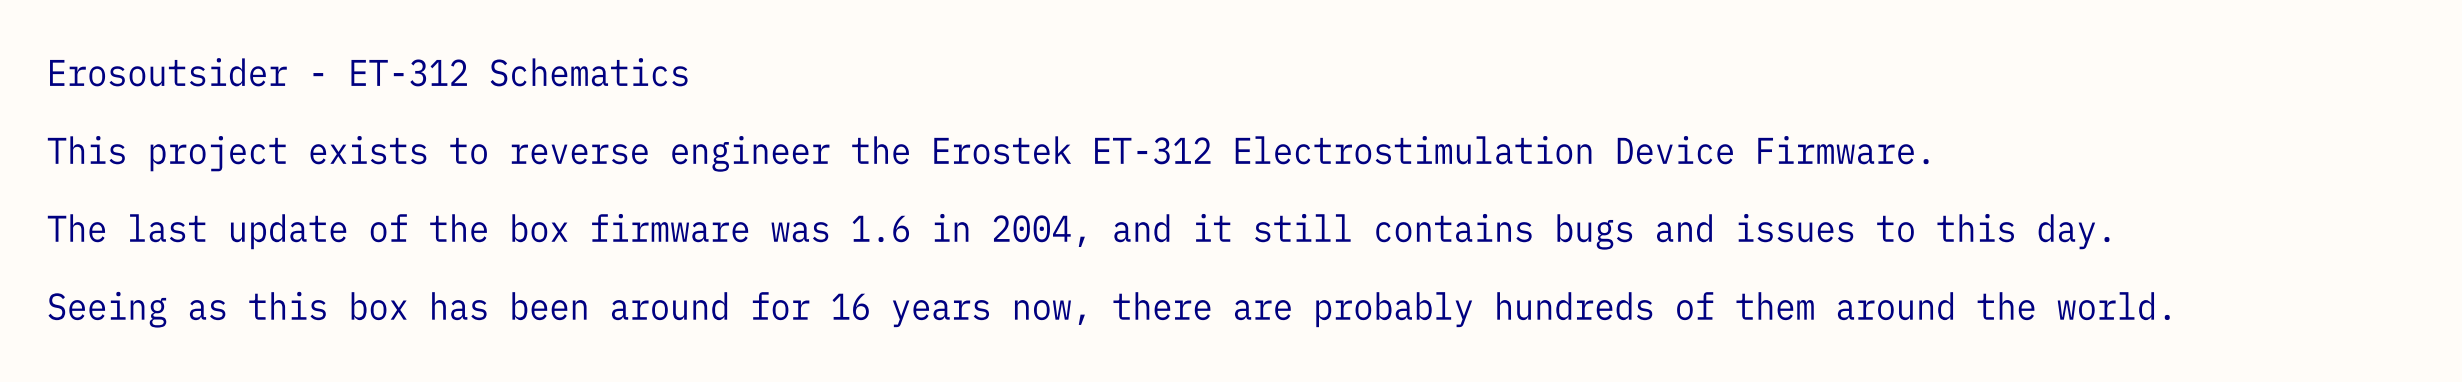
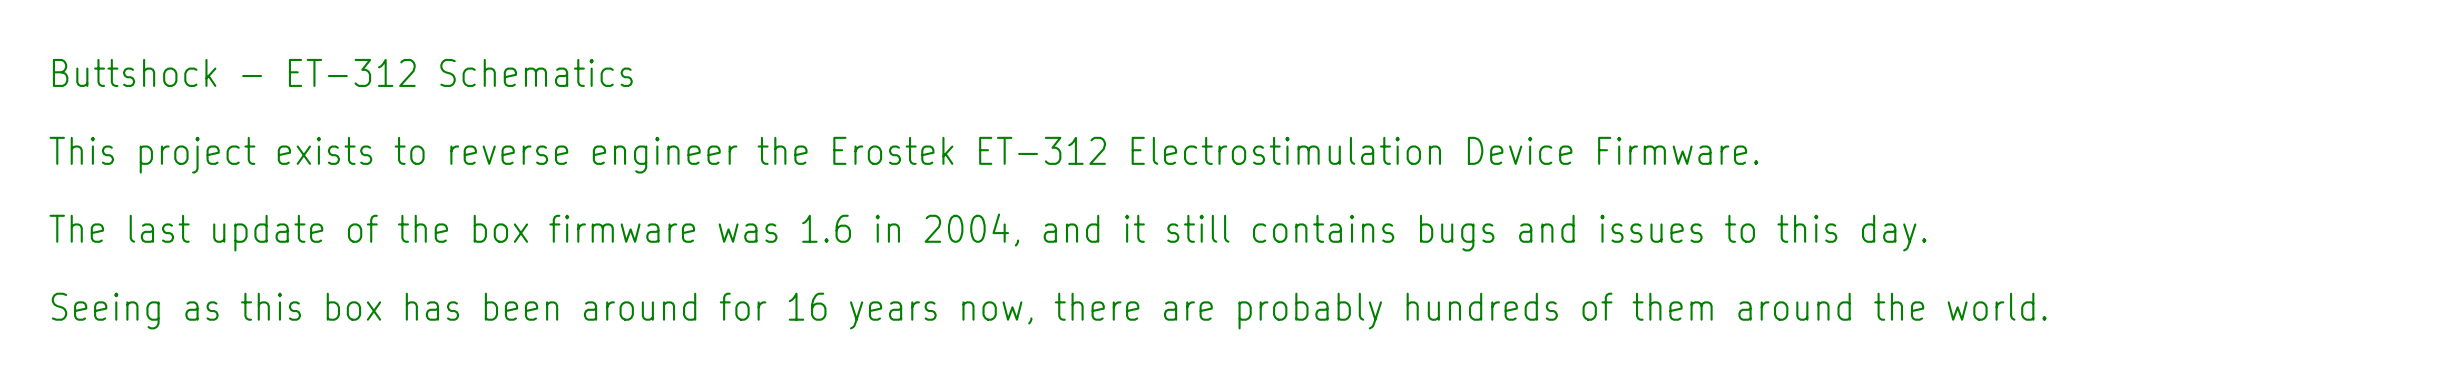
text: Erosoutsider - ET-312 Schematics (368, 72) -> Buttshock - ET-312 Schematics (342, 72)

